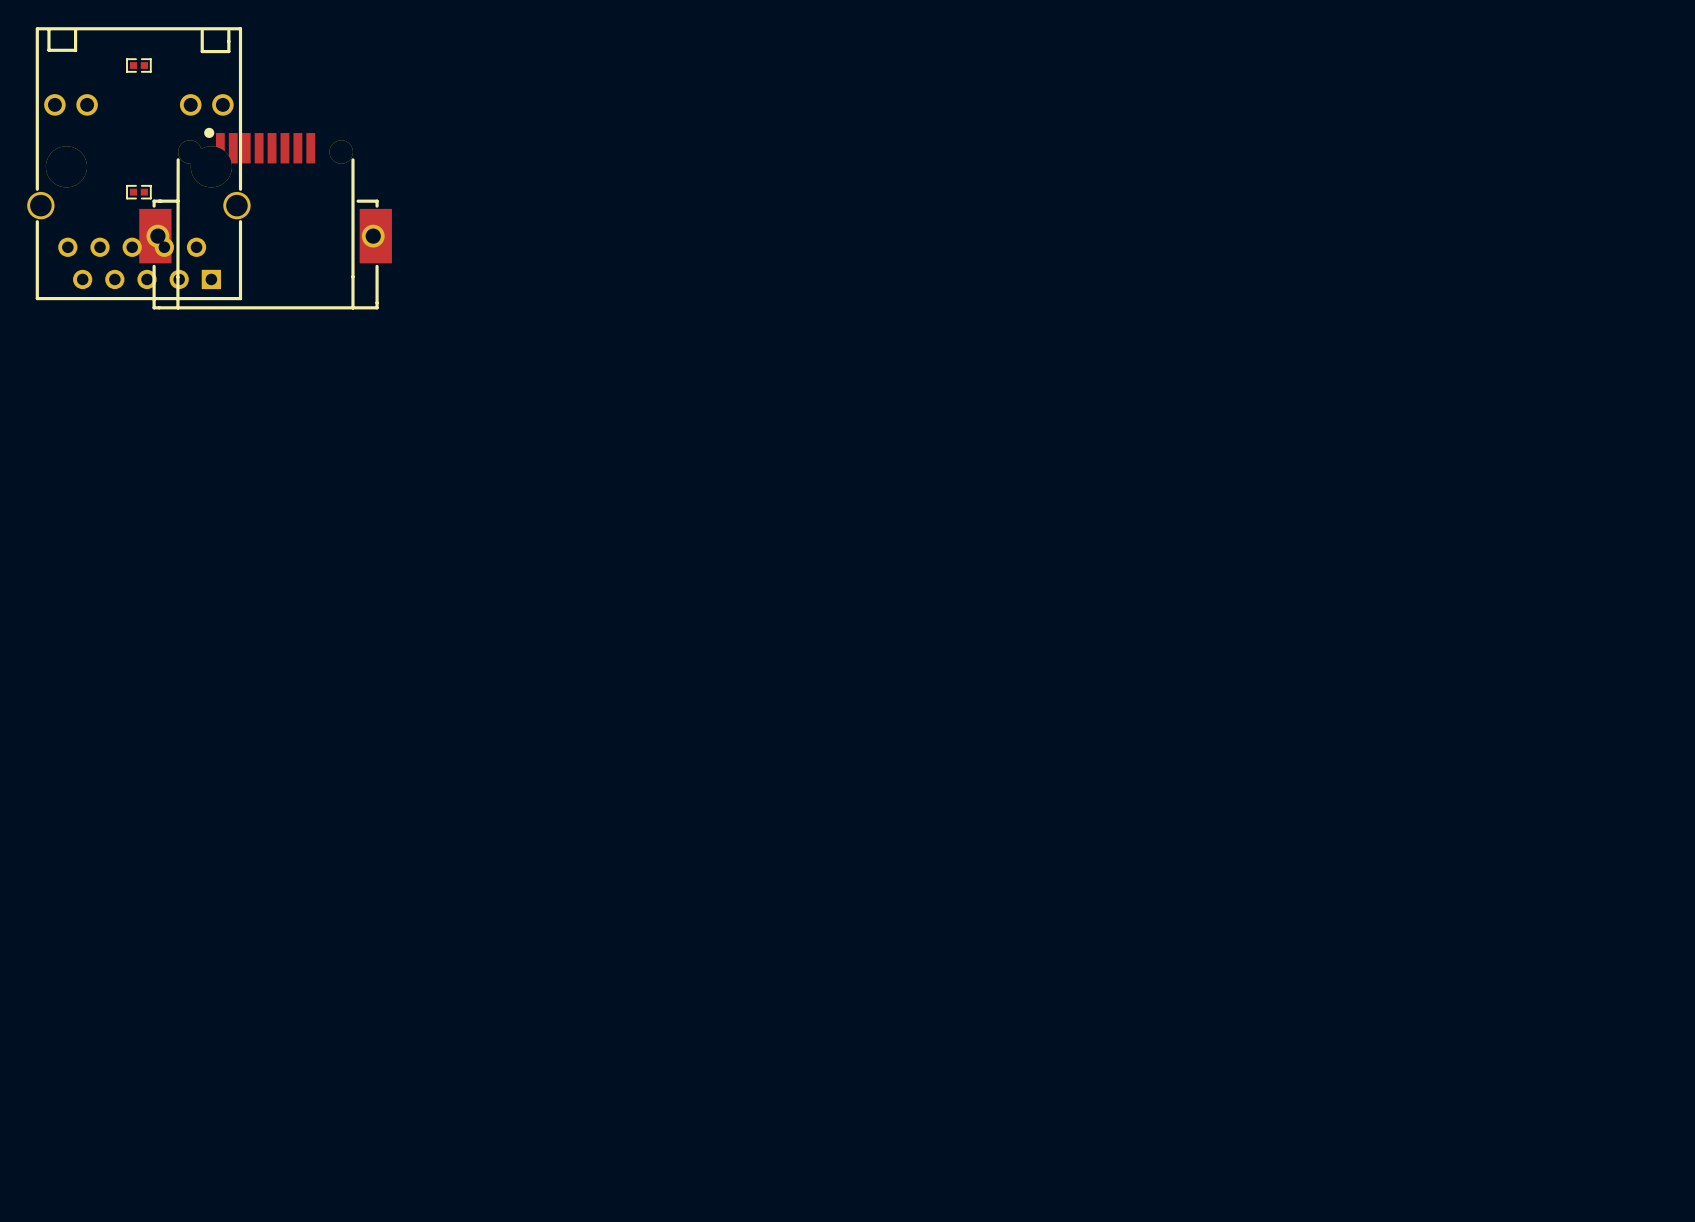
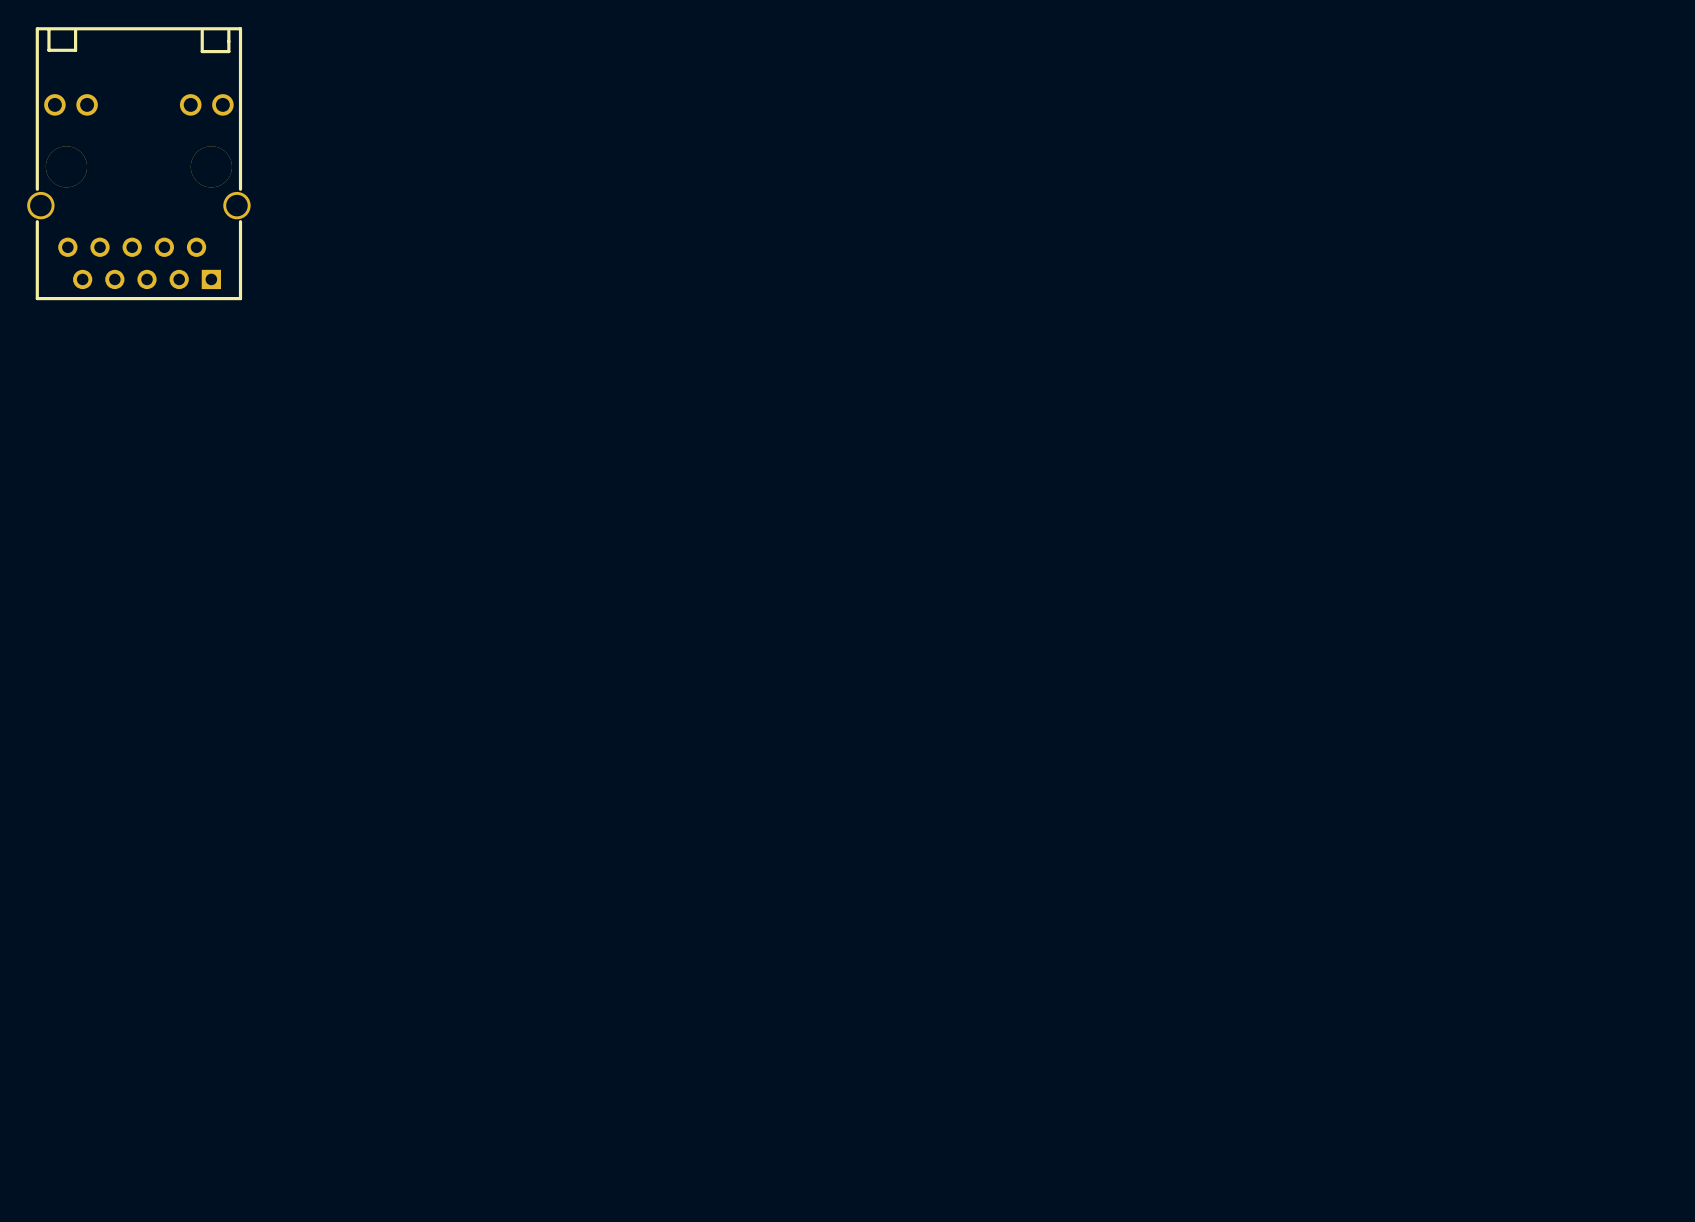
part: (138, 65) -> none
part: (138, 192) -> none
part: (265, 218) -> none

